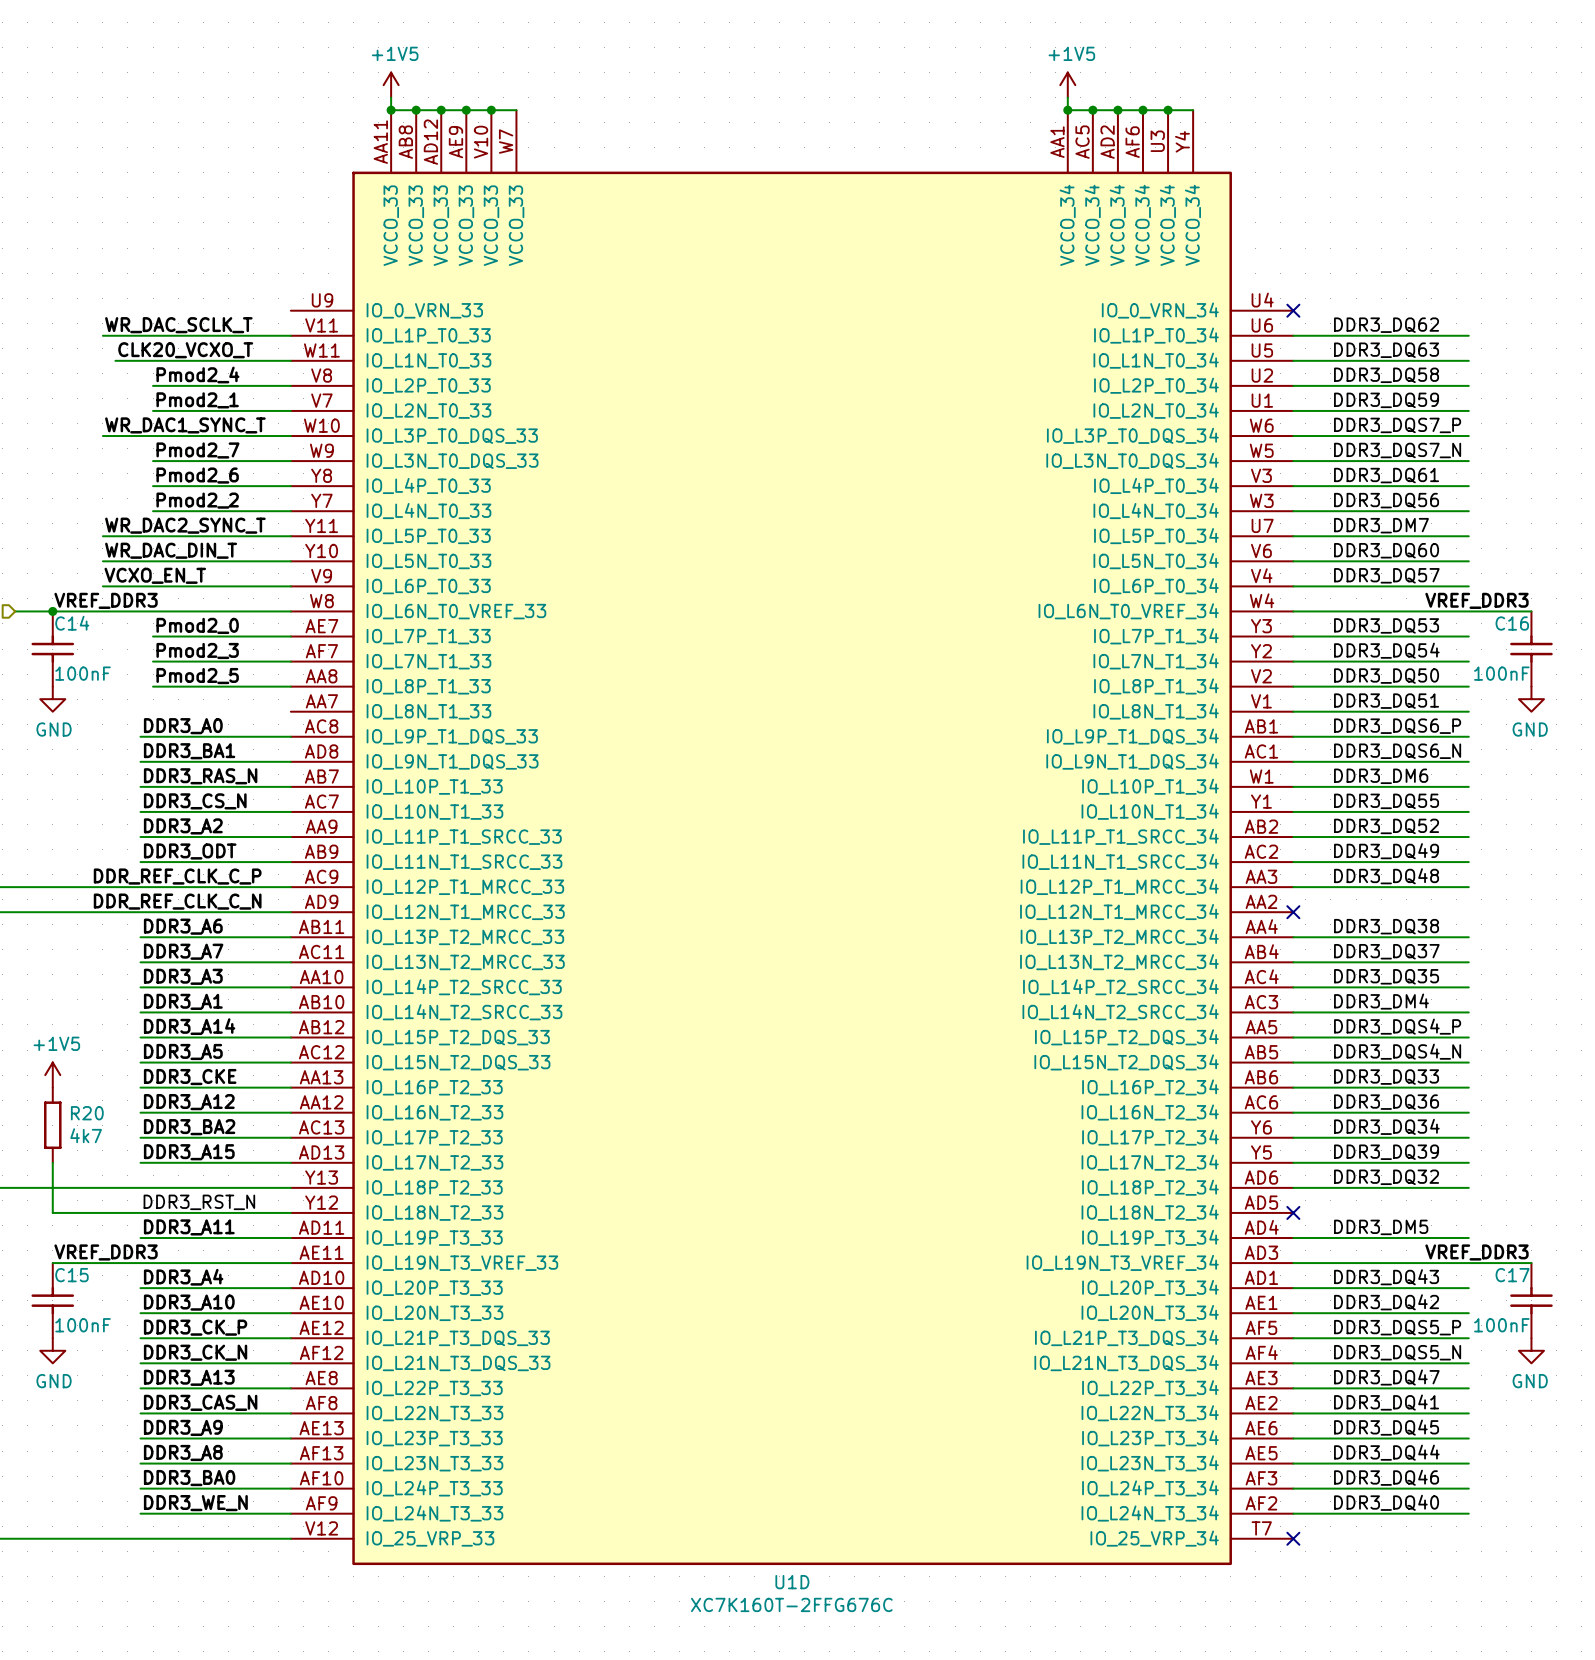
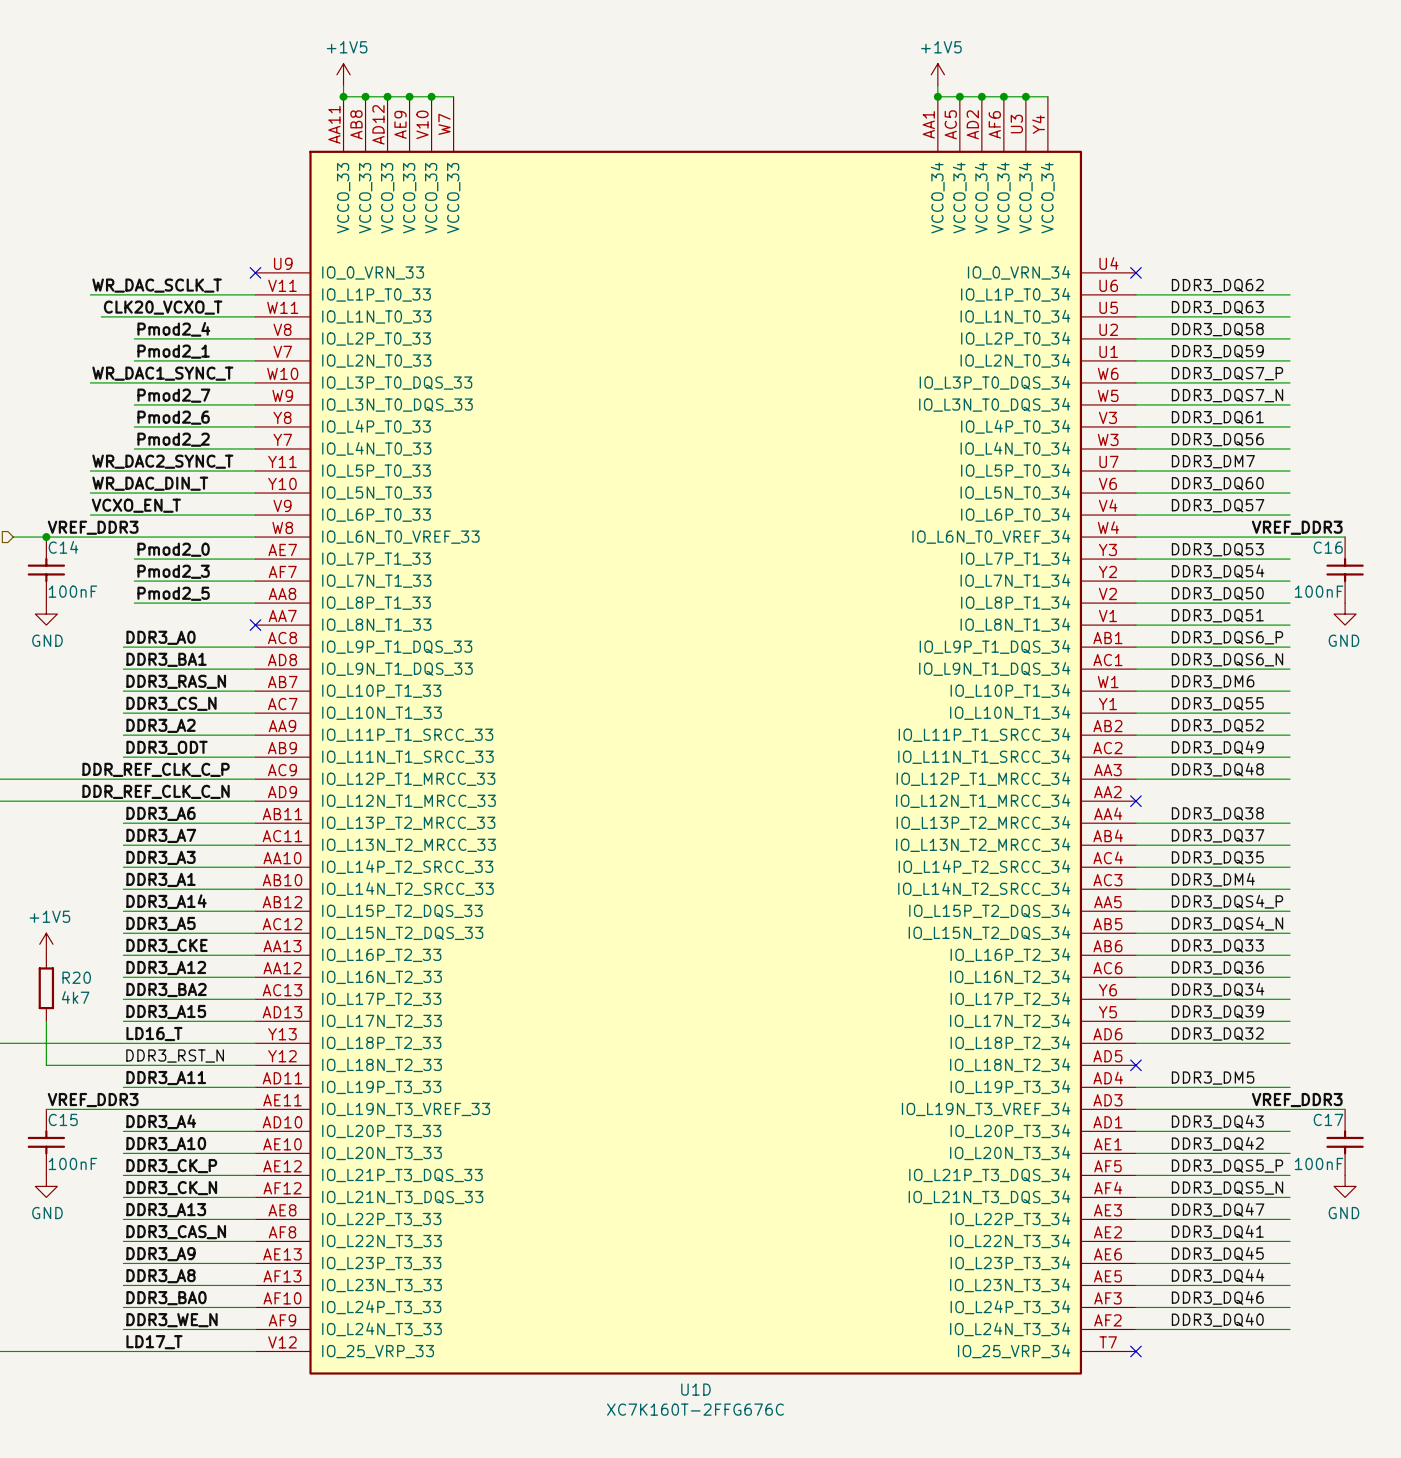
no-connect mark: none -> (255, 272)
no-connect mark: none -> (255, 625)
label: none -> LD16_T (154, 1034)
label: none -> LD17_T (154, 1342)

